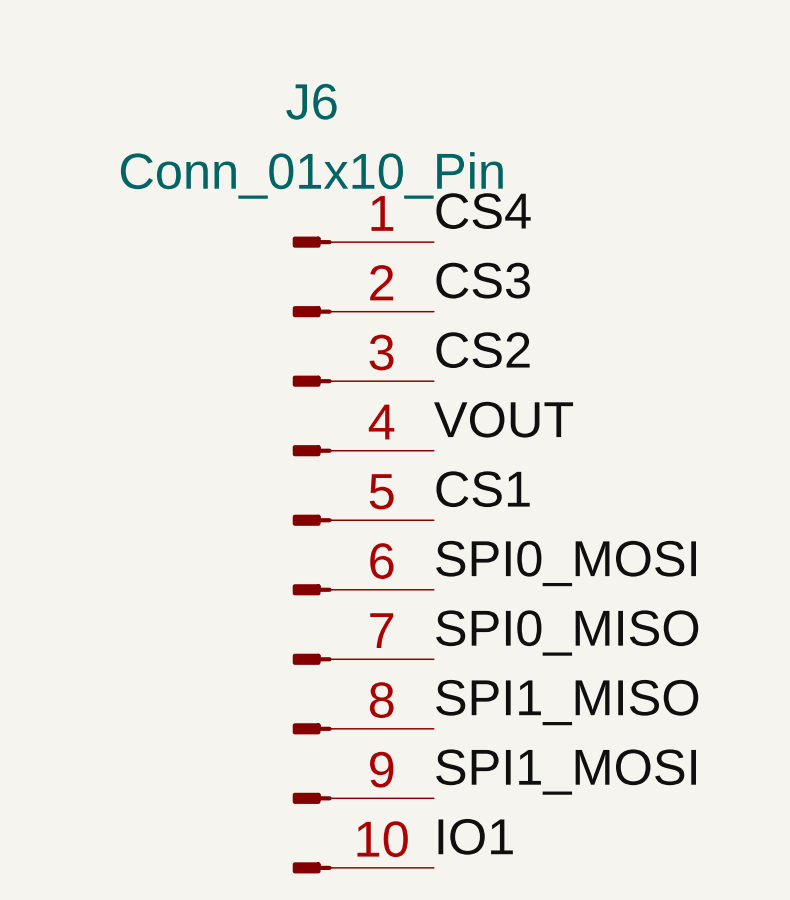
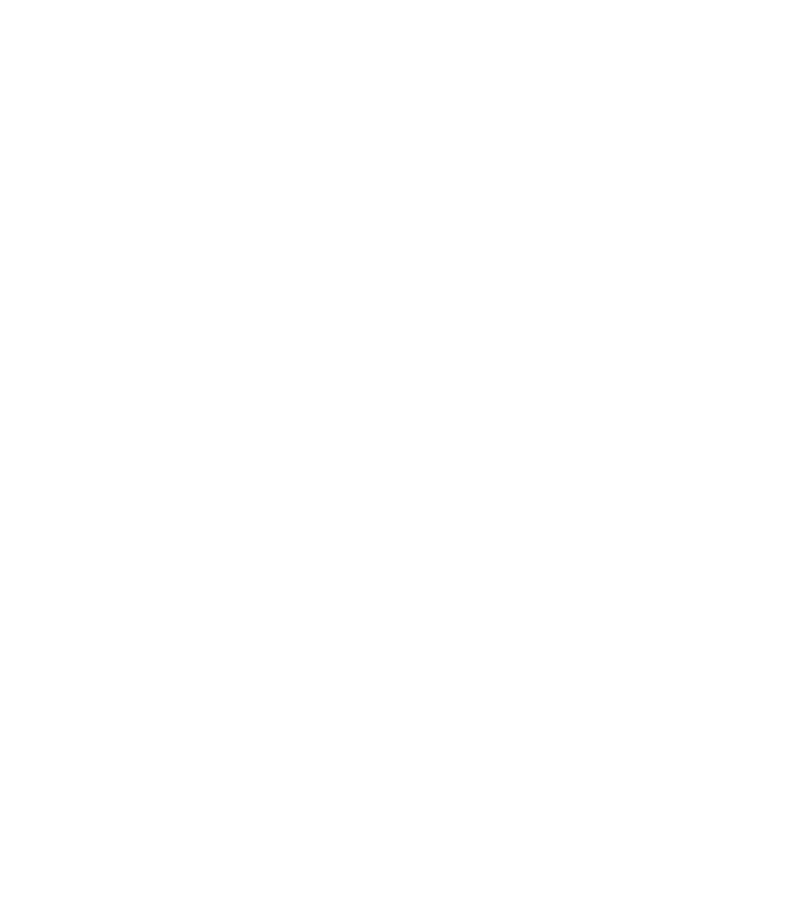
label: CS4 (483, 211) -> none
label: CS3 (483, 280) -> none
label: CS2 (483, 350) -> none
label: VOUT (503, 419) -> none
label: CS1 (483, 489) -> none
J6: Conn_01x10_Pin (363, 555) -> none
label: SPI0_MOSI (566, 563) -> none
label: SPI0_MISO (567, 633) -> none
label: SPI1_MISO (567, 702) -> none
label: SPI1_MOSI (566, 772) -> none
label: IO1 (475, 836) -> none

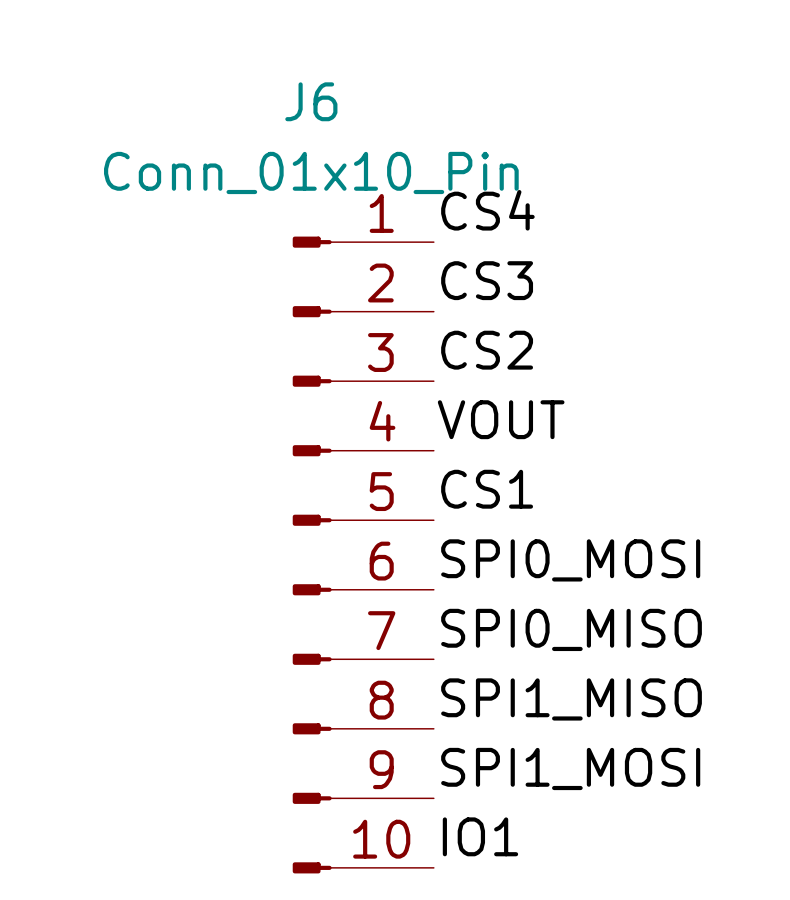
label: none -> CS4 (487, 210)
label: none -> CS3 (487, 280)
label: none -> CS2 (487, 350)
label: none -> VOUT (501, 419)
label: none -> CS1 (487, 489)
J6: none -> Conn_01x10_Pin (363, 555)
label: none -> SPI0_MOSI (570, 560)
label: none -> SPI0_MISO (571, 629)
label: none -> SPI1_MISO (571, 699)
label: none -> SPI1_MOSI (570, 768)
label: none -> IO1 (480, 836)

